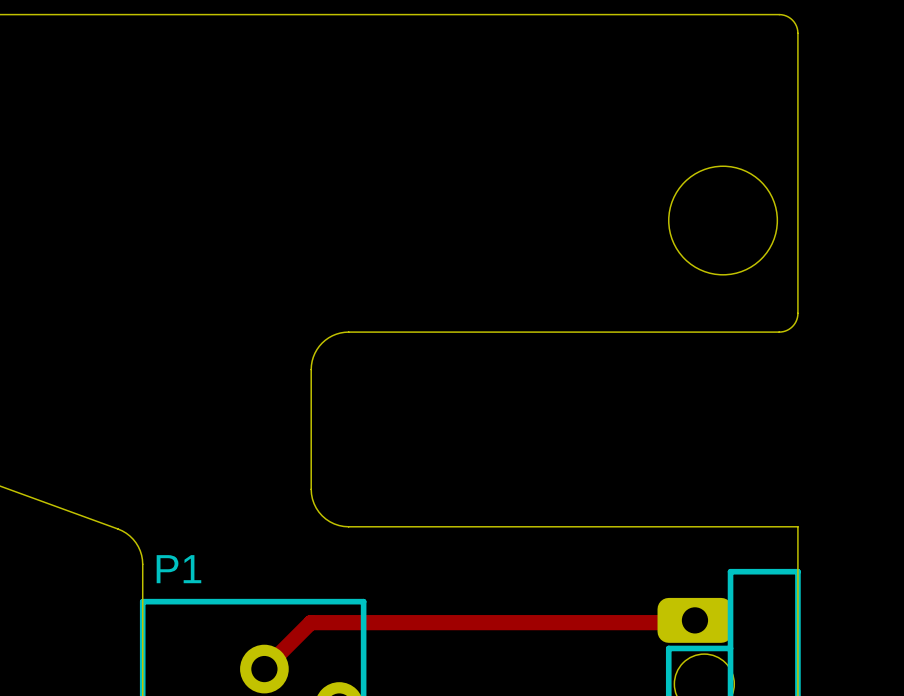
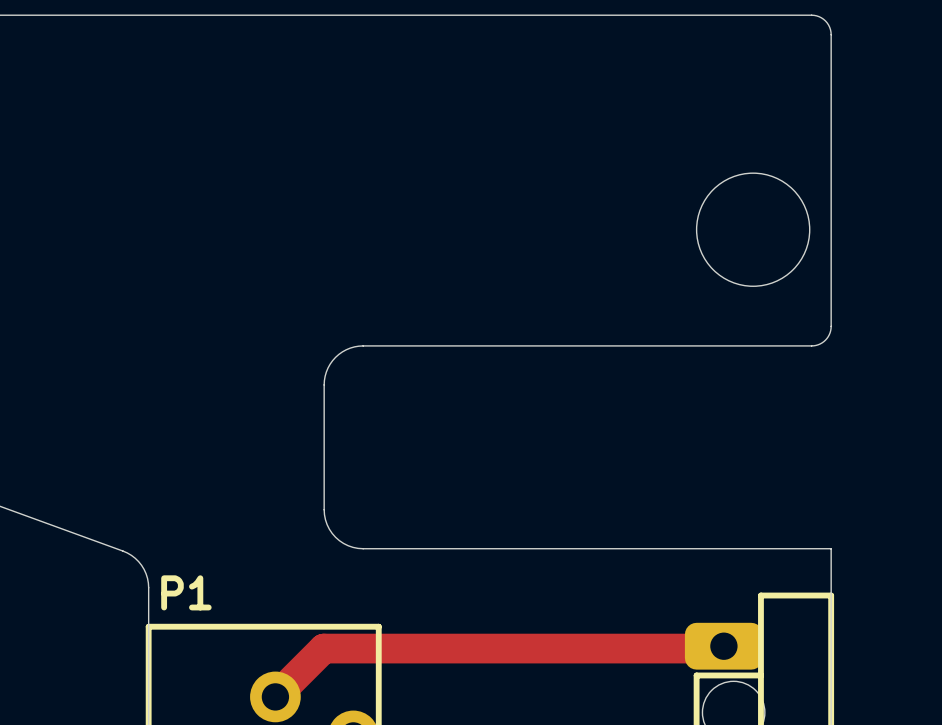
top track width: thin (694, 622) (310, 622) (264, 669) -> thick (723, 648) (323, 648) (275, 696)

